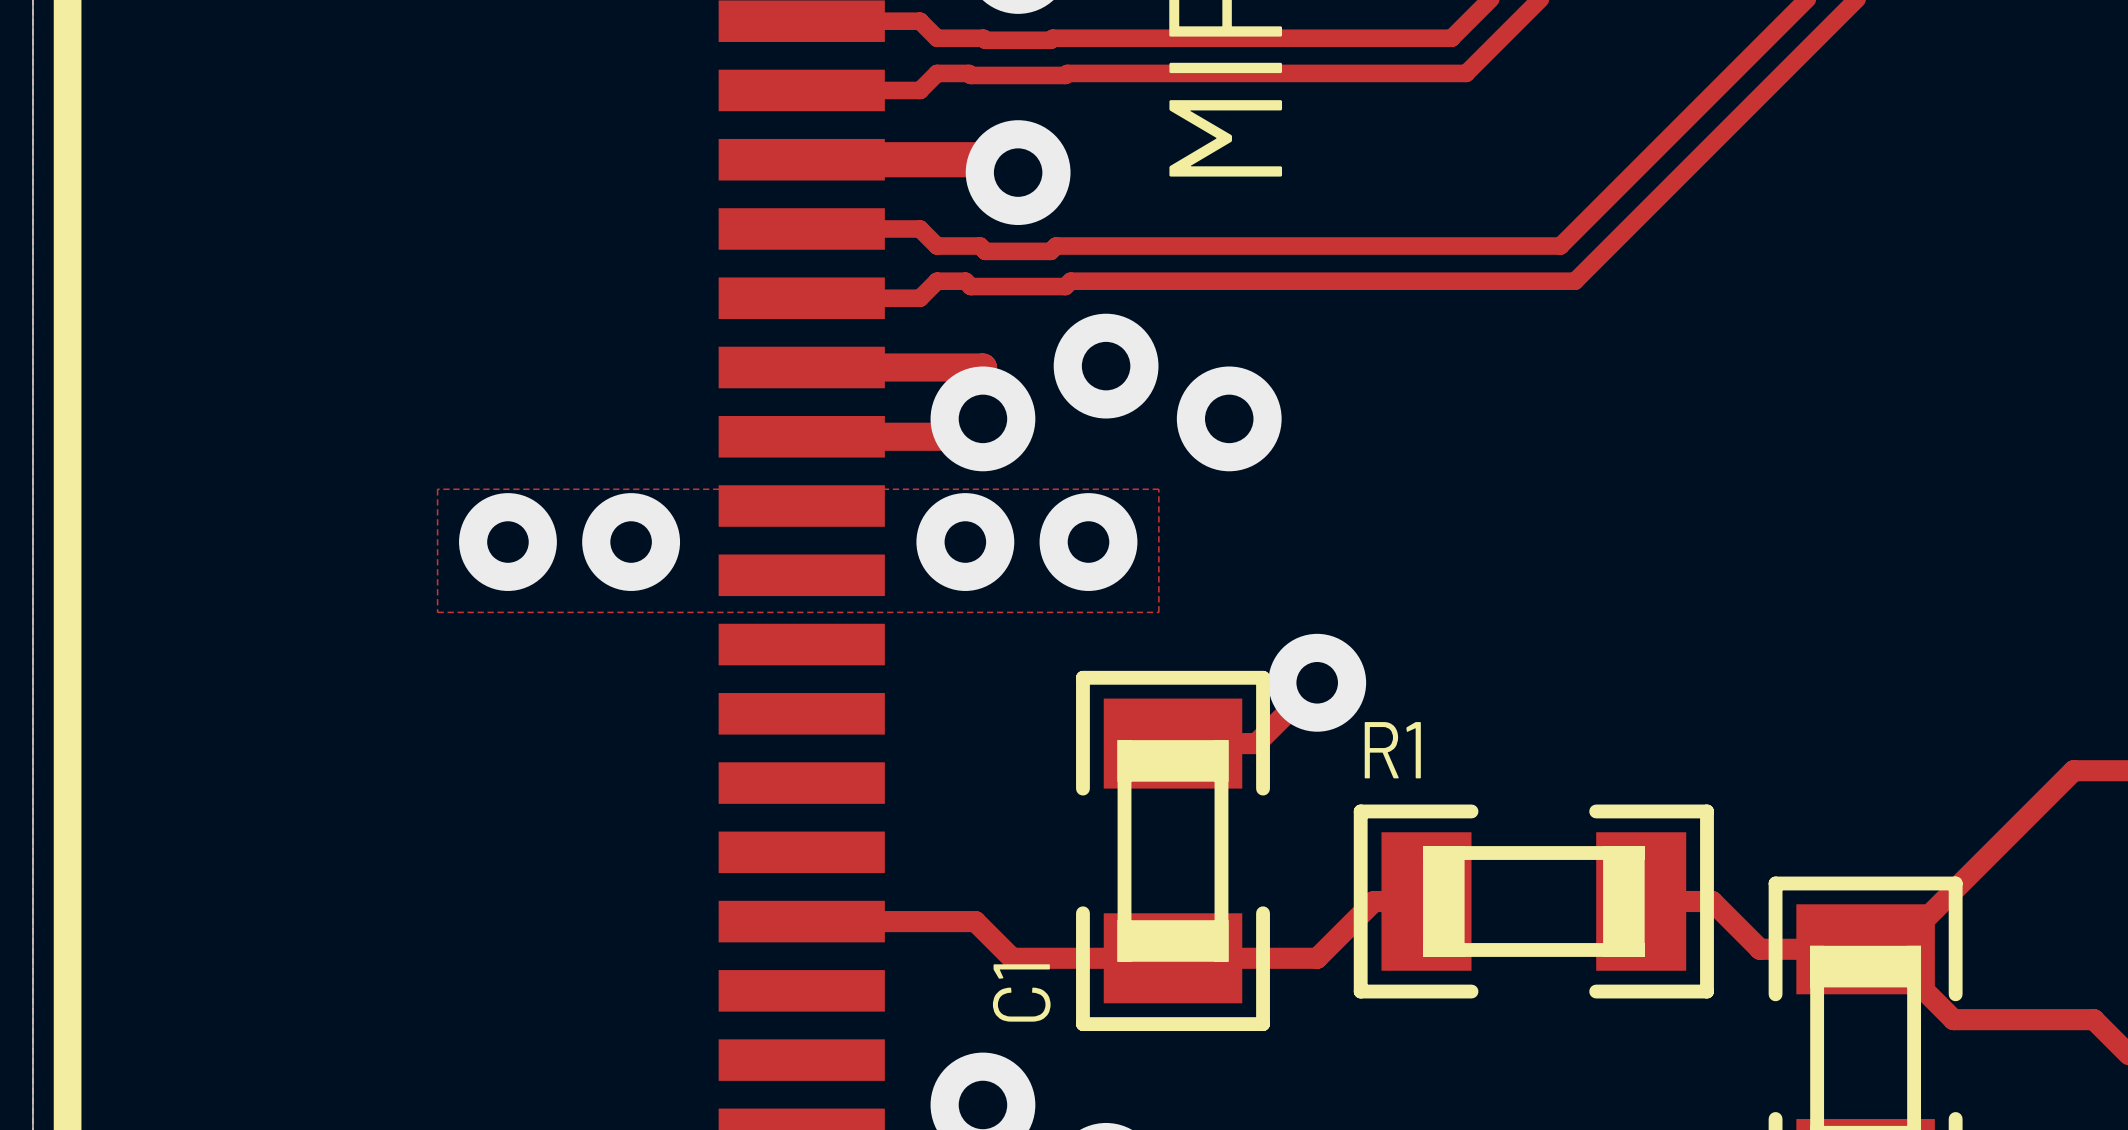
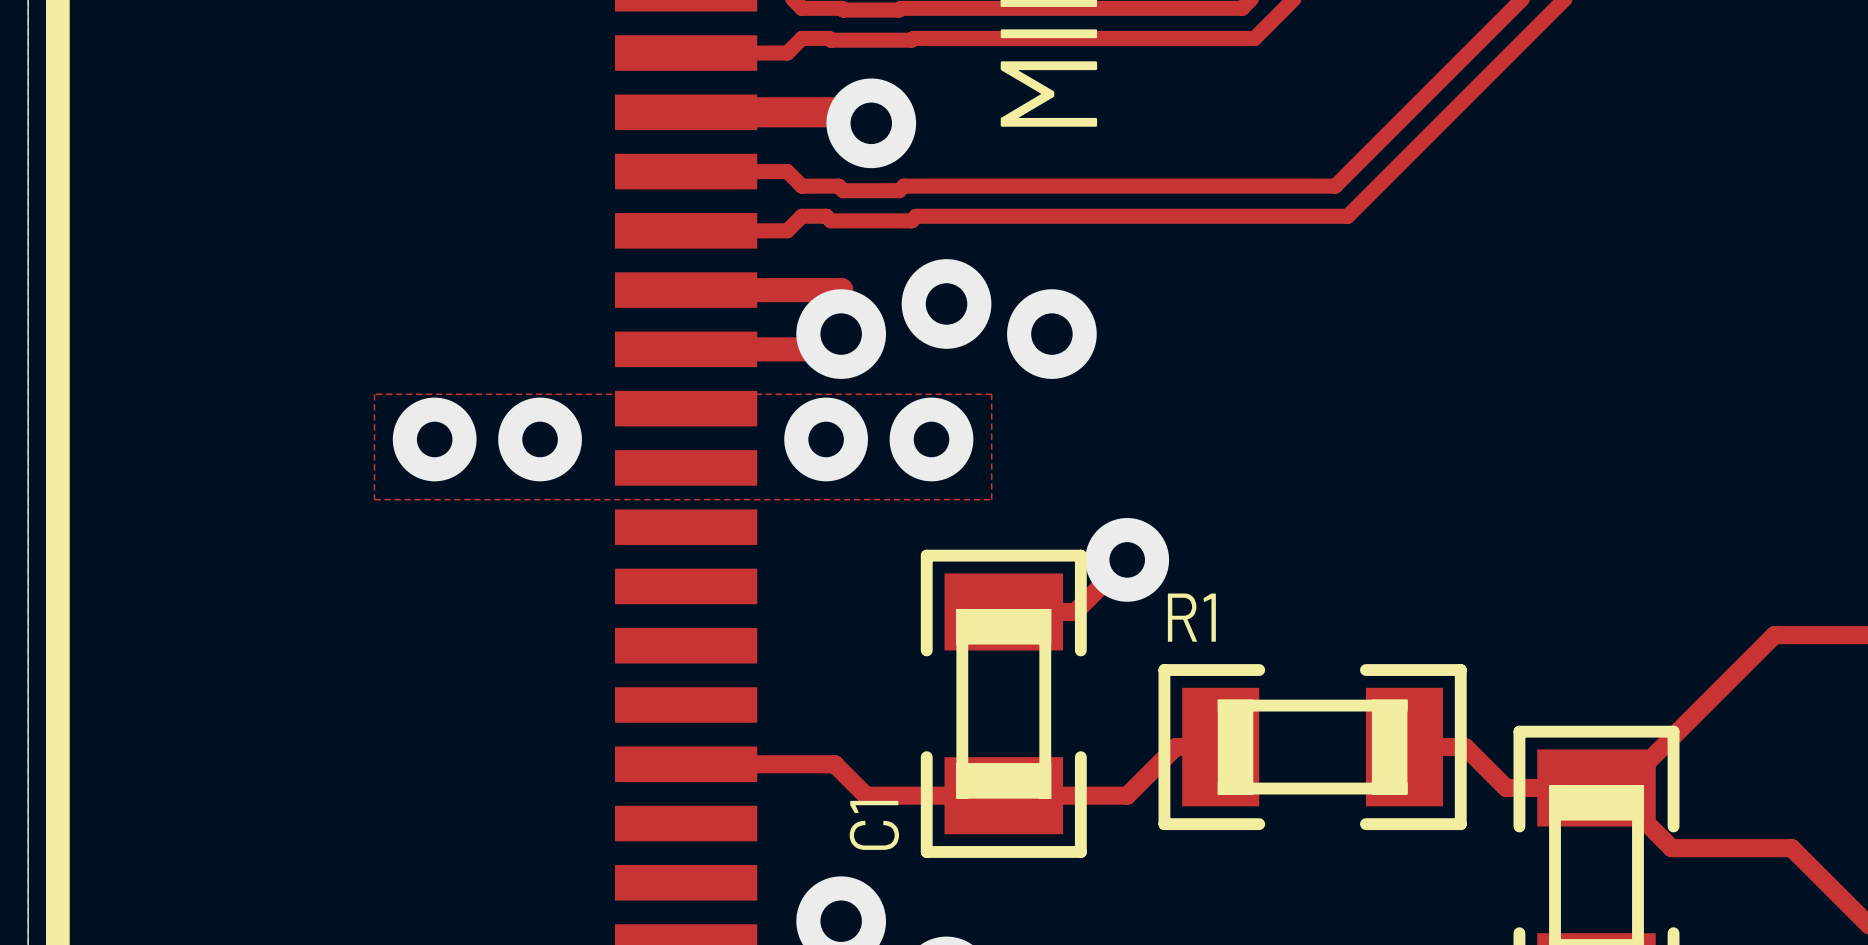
via position: (1106, 366) -> (946, 303)

